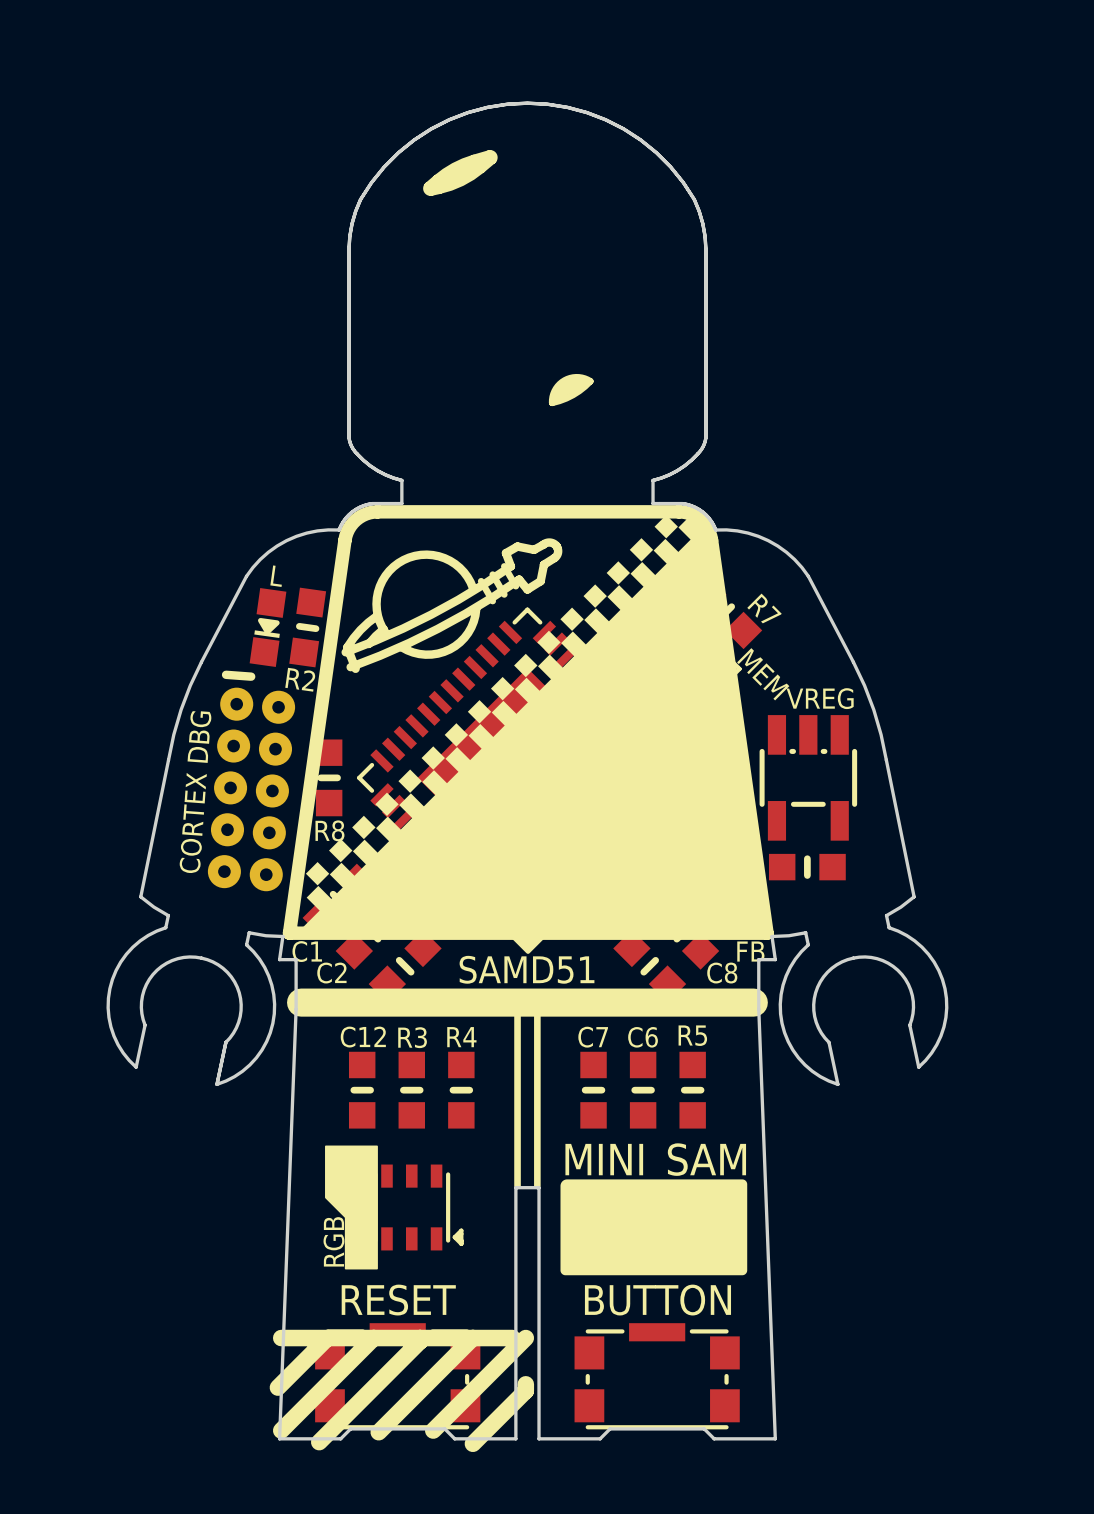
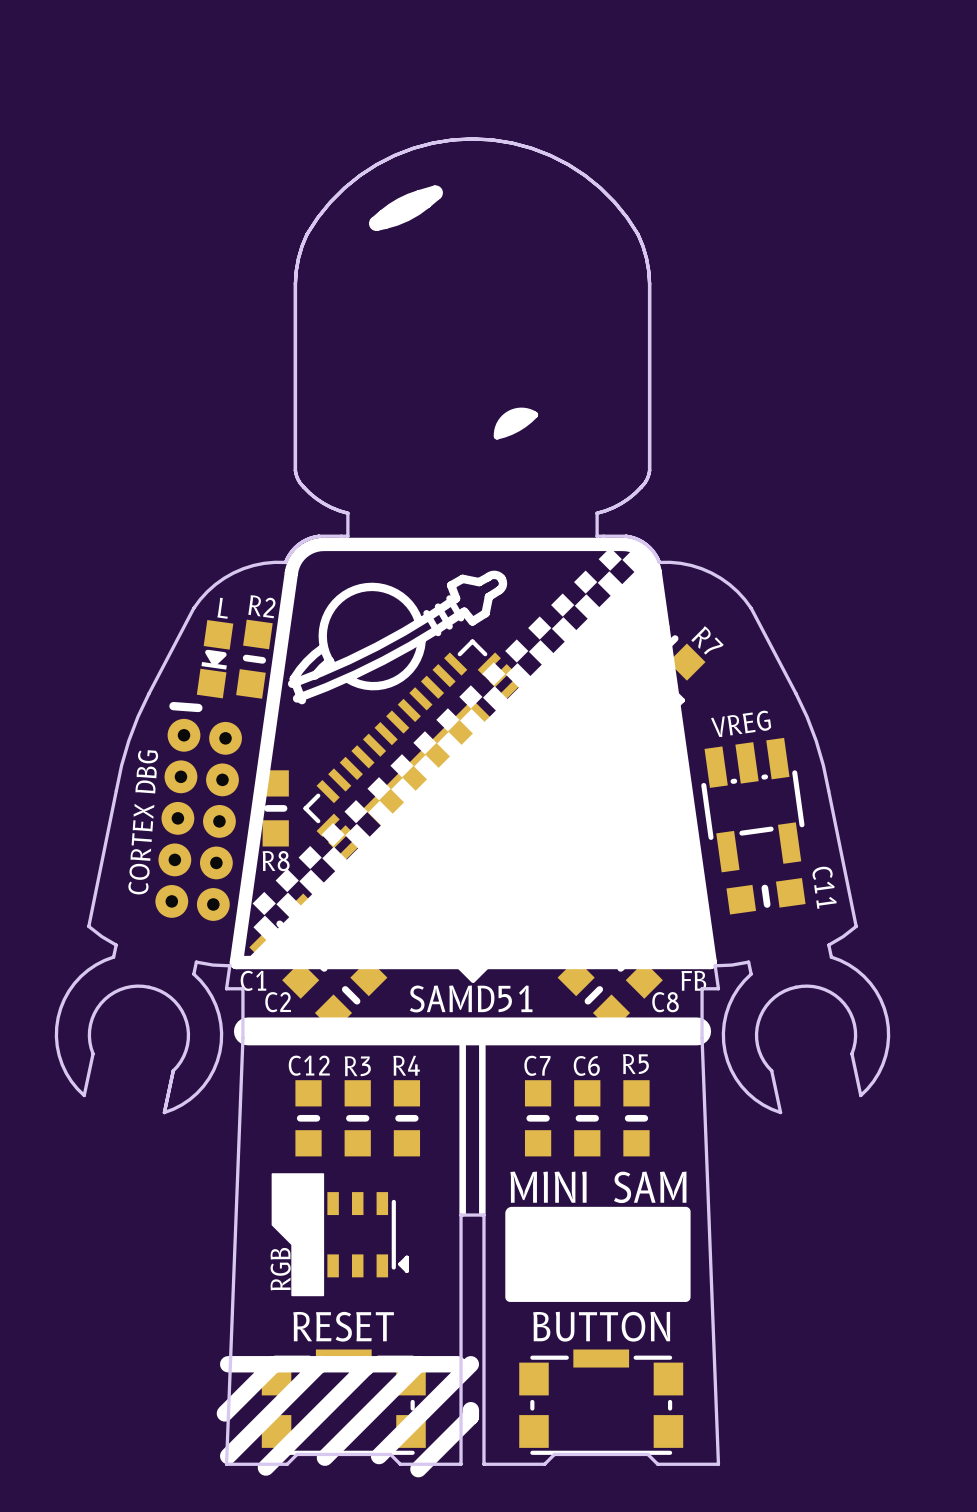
text: MEM (763, 674) -> none
text position: R2 (300, 679) -> R2 (261, 606)
VREG rotation: 0° (808, 777) -> 7.9° counterclockwise (752, 805)
C11: none -> (766, 896)
part: (807, 867) -> none

